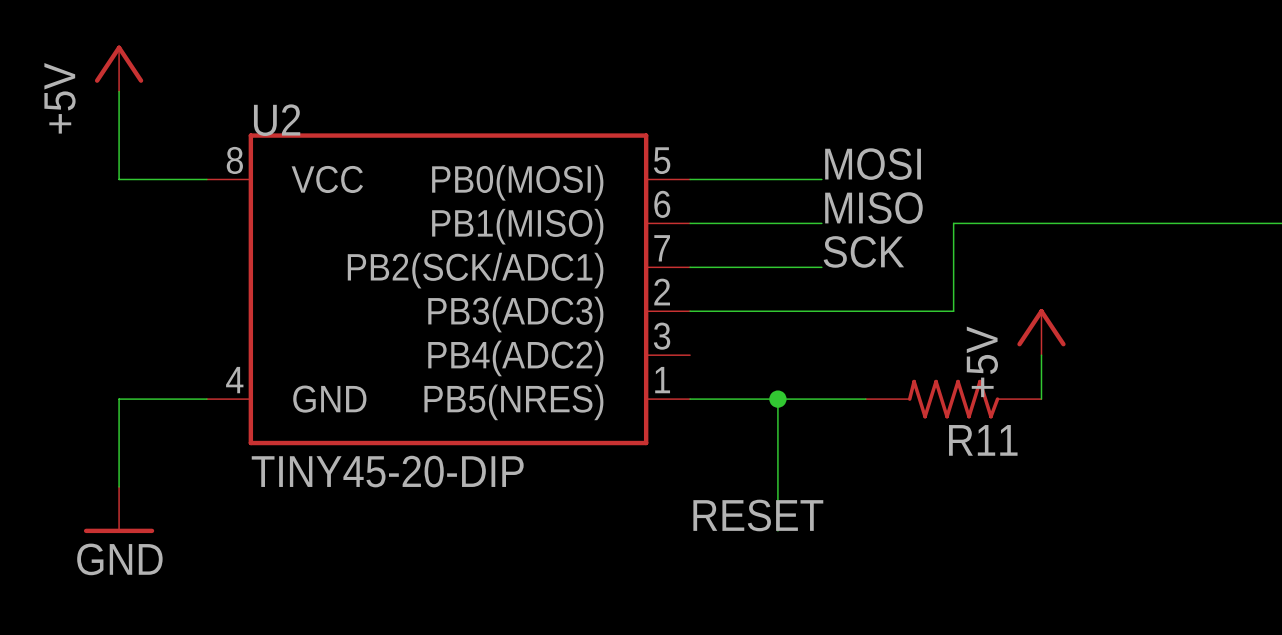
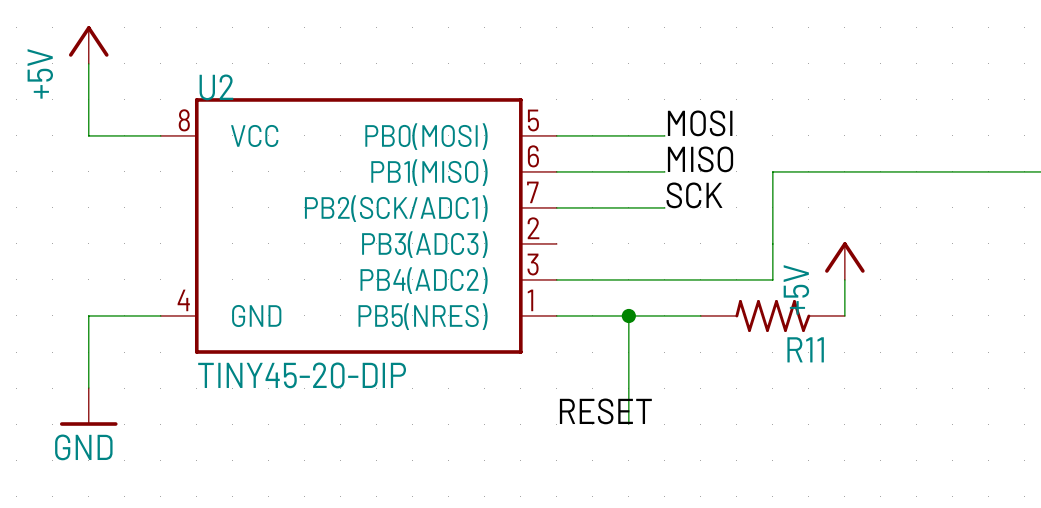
wire: (690, 311) (953, 311) -> (556, 279) (772, 279) (772, 243)

